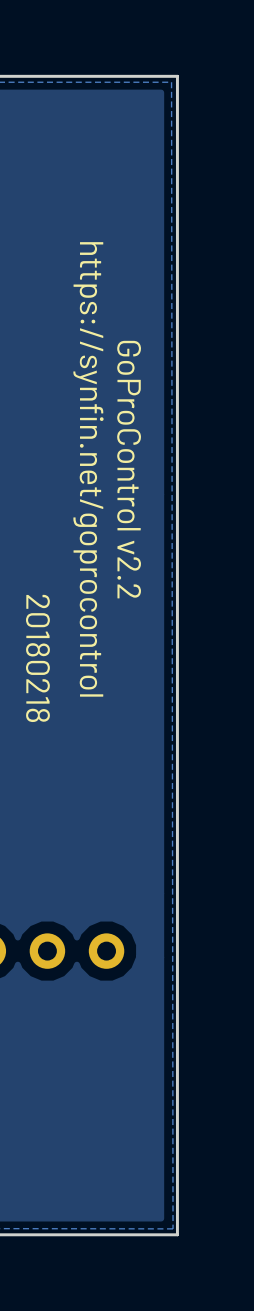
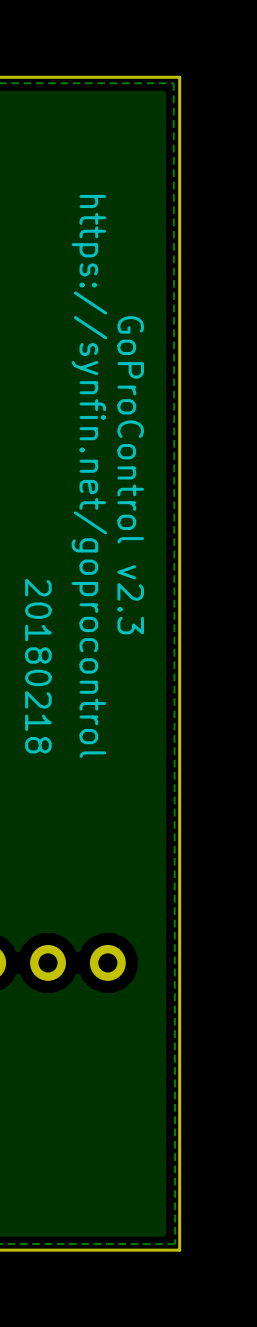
text: GoProControl v2.2 (129, 469) -> GoProControl v2.3 (130, 475)

